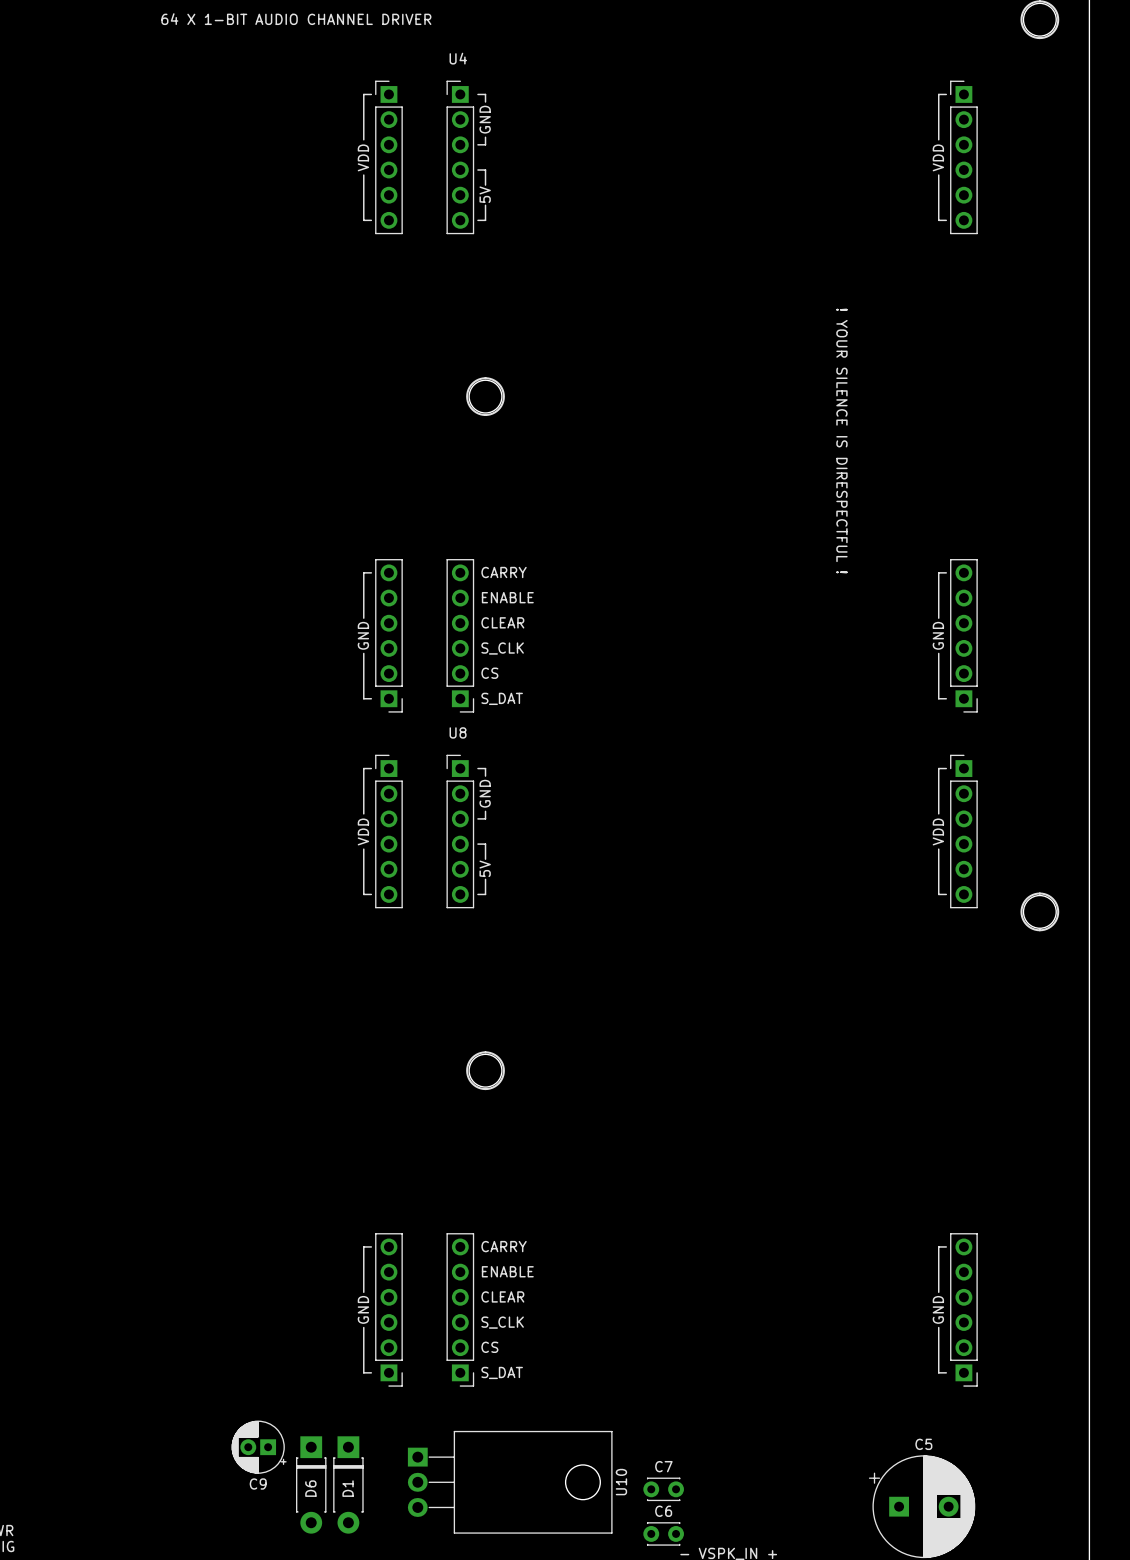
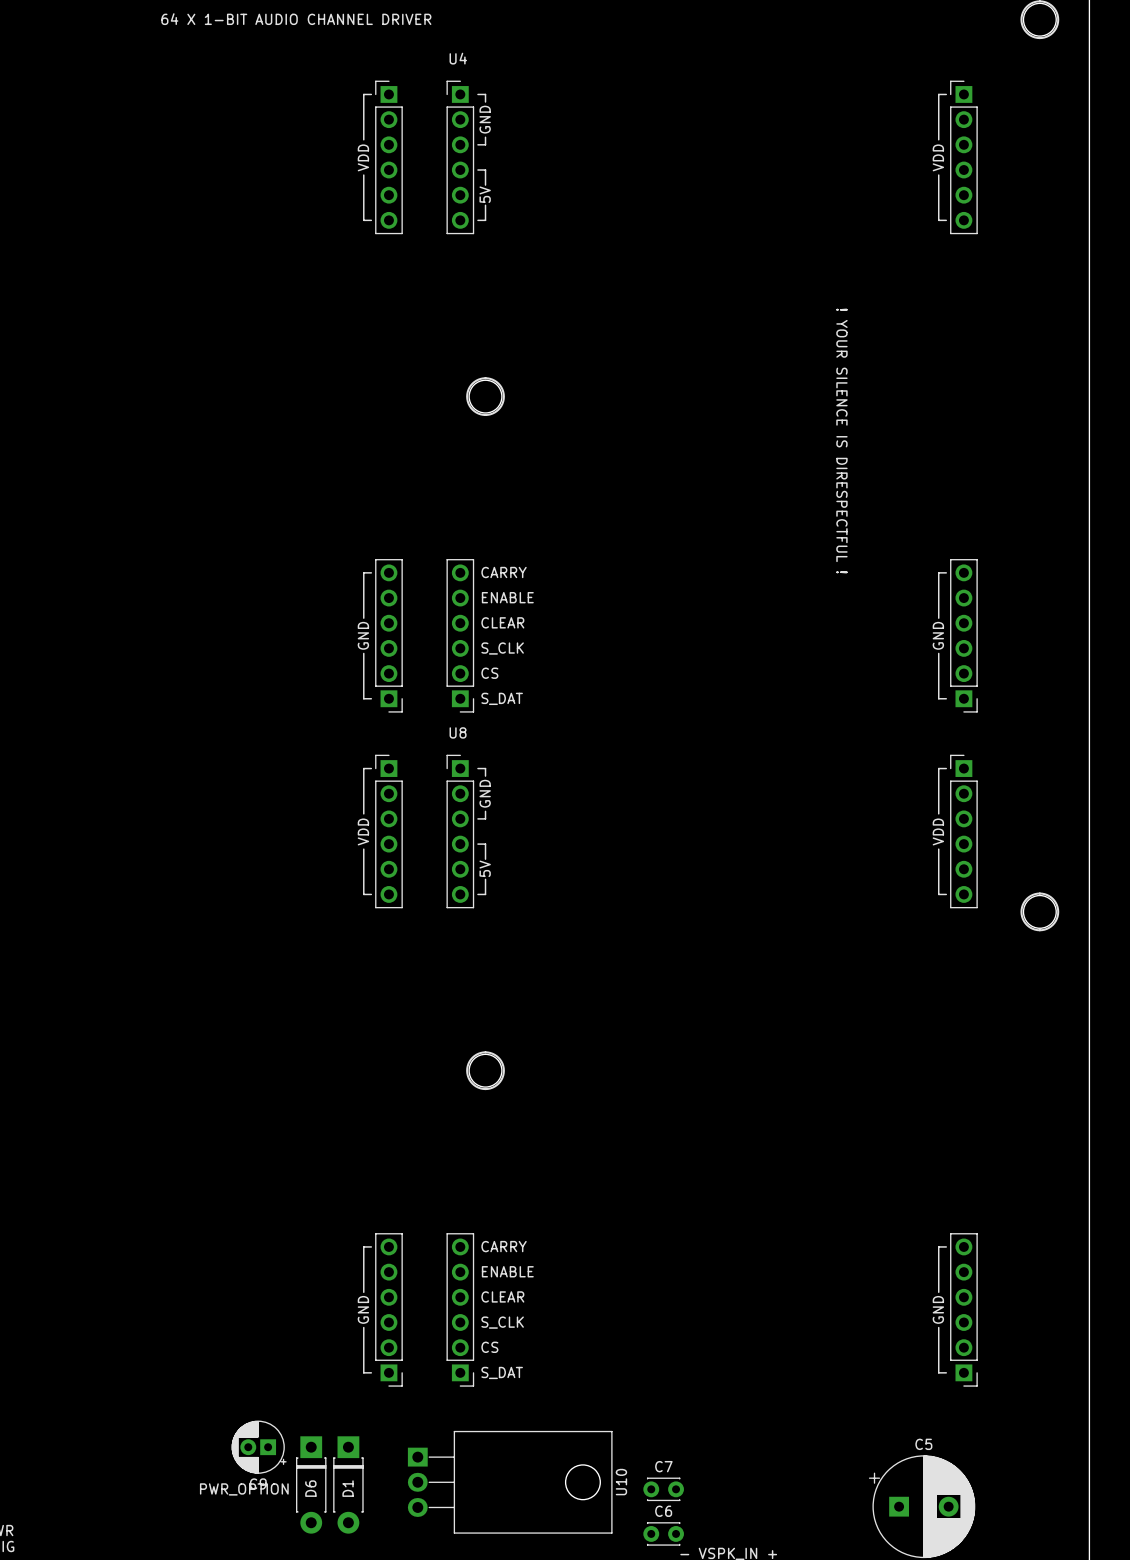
text: none -> PWR_OPTION (244, 1489)

